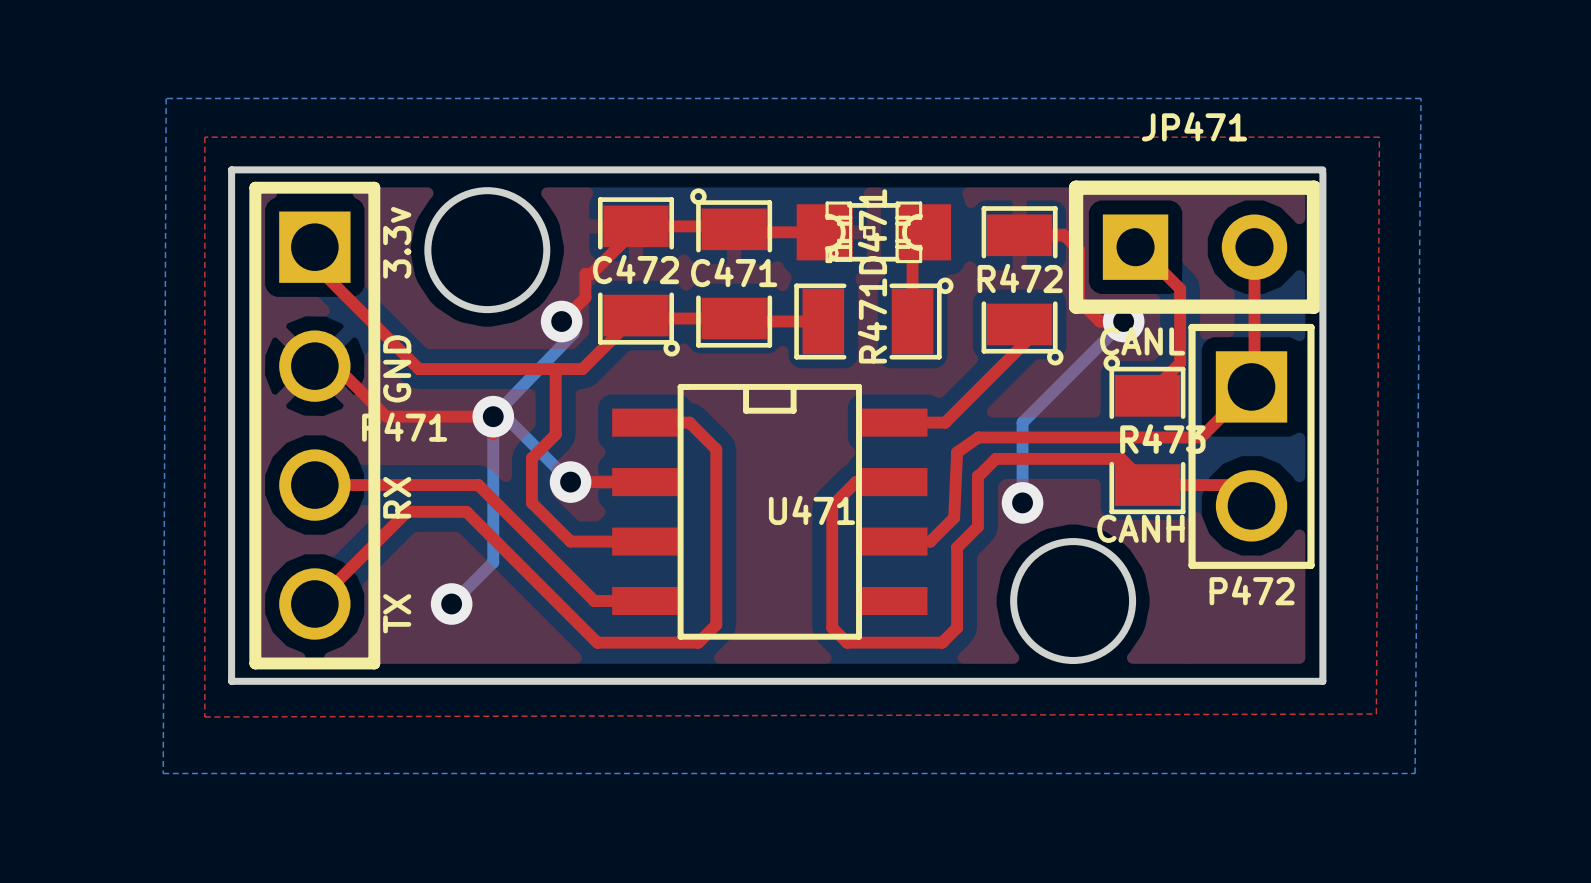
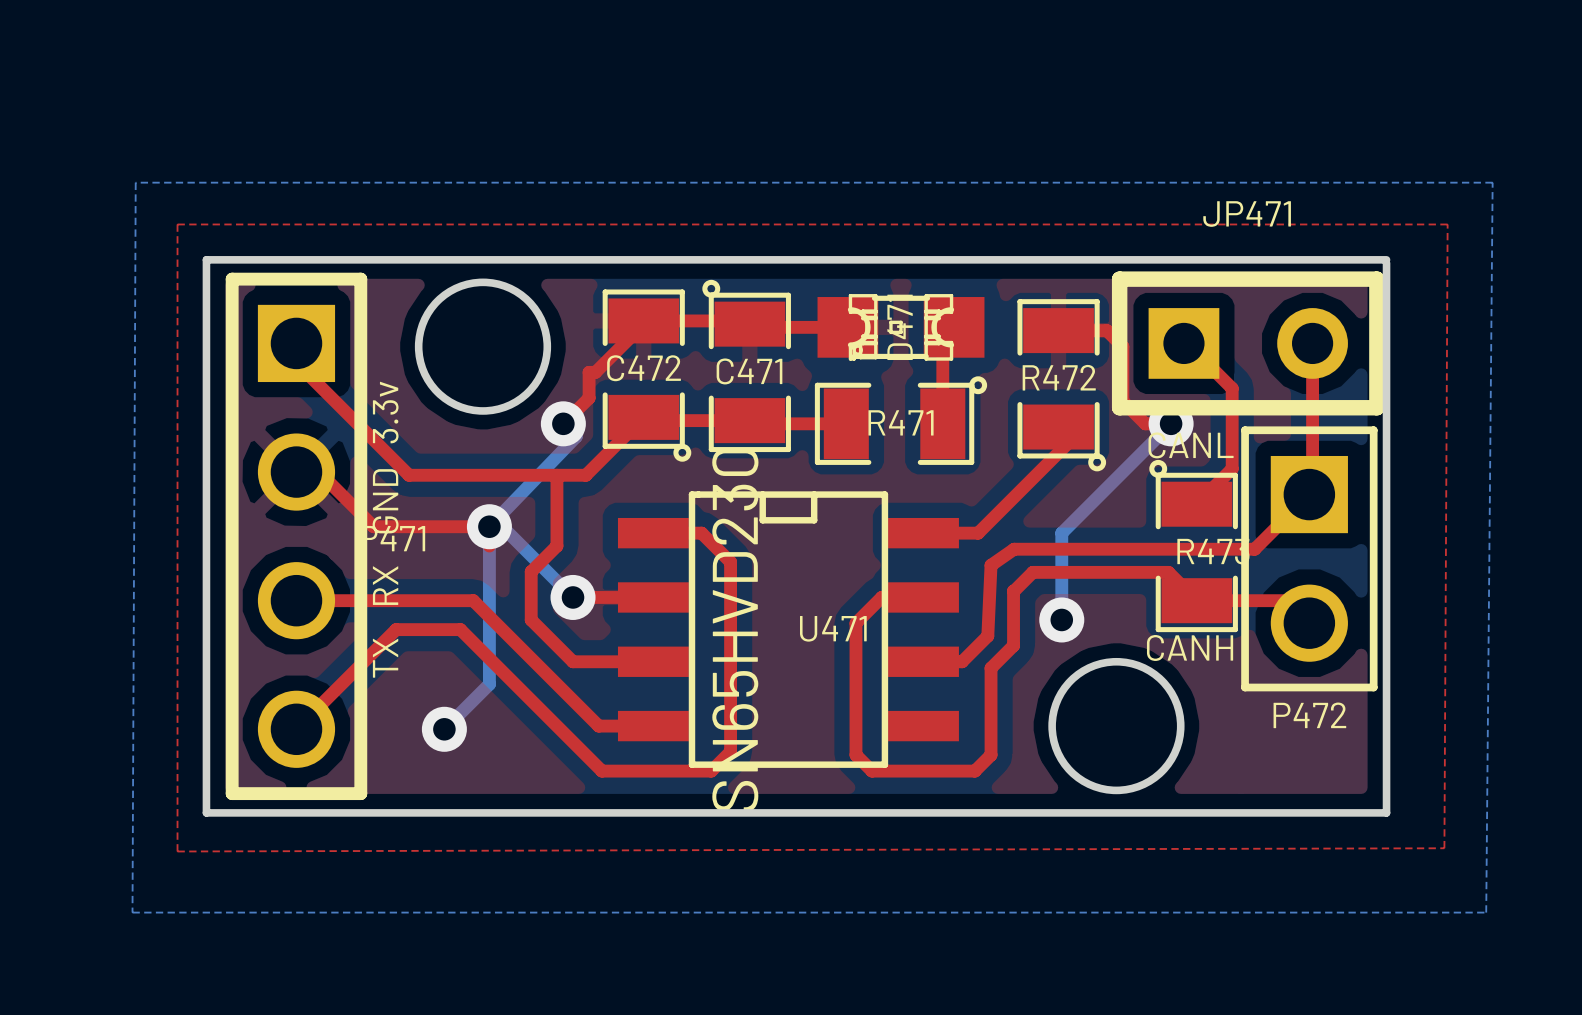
R471 name rotation: 0° (872, 320) -> 90° clockwise (901, 422)
U471 value: none -> SN65HVD230 (735, 630)

